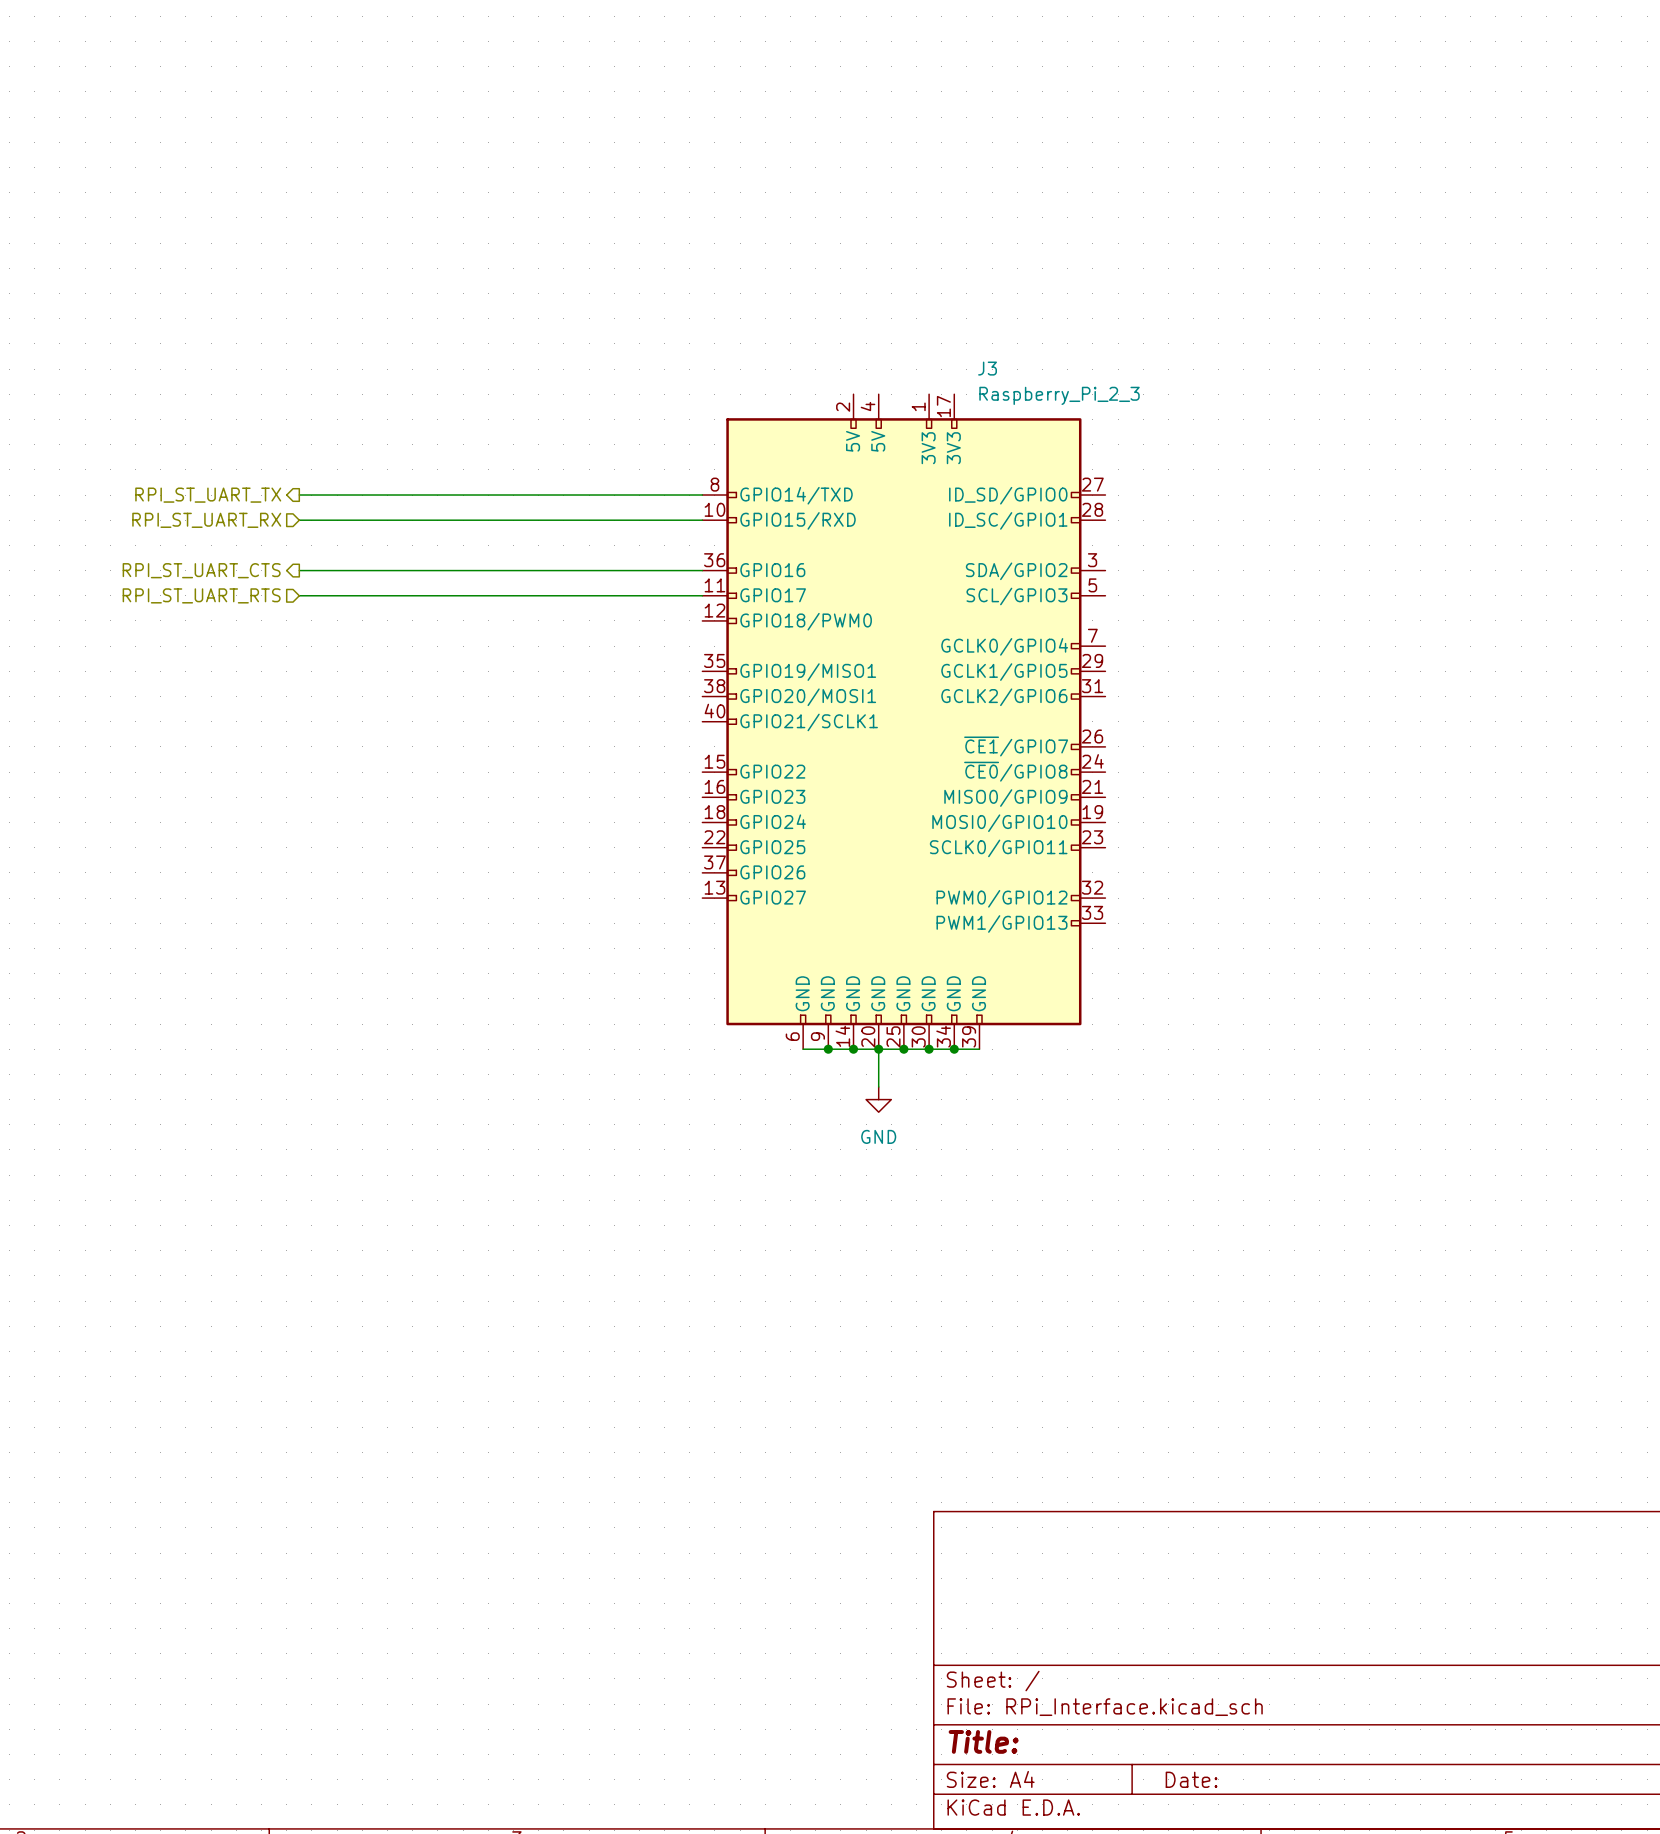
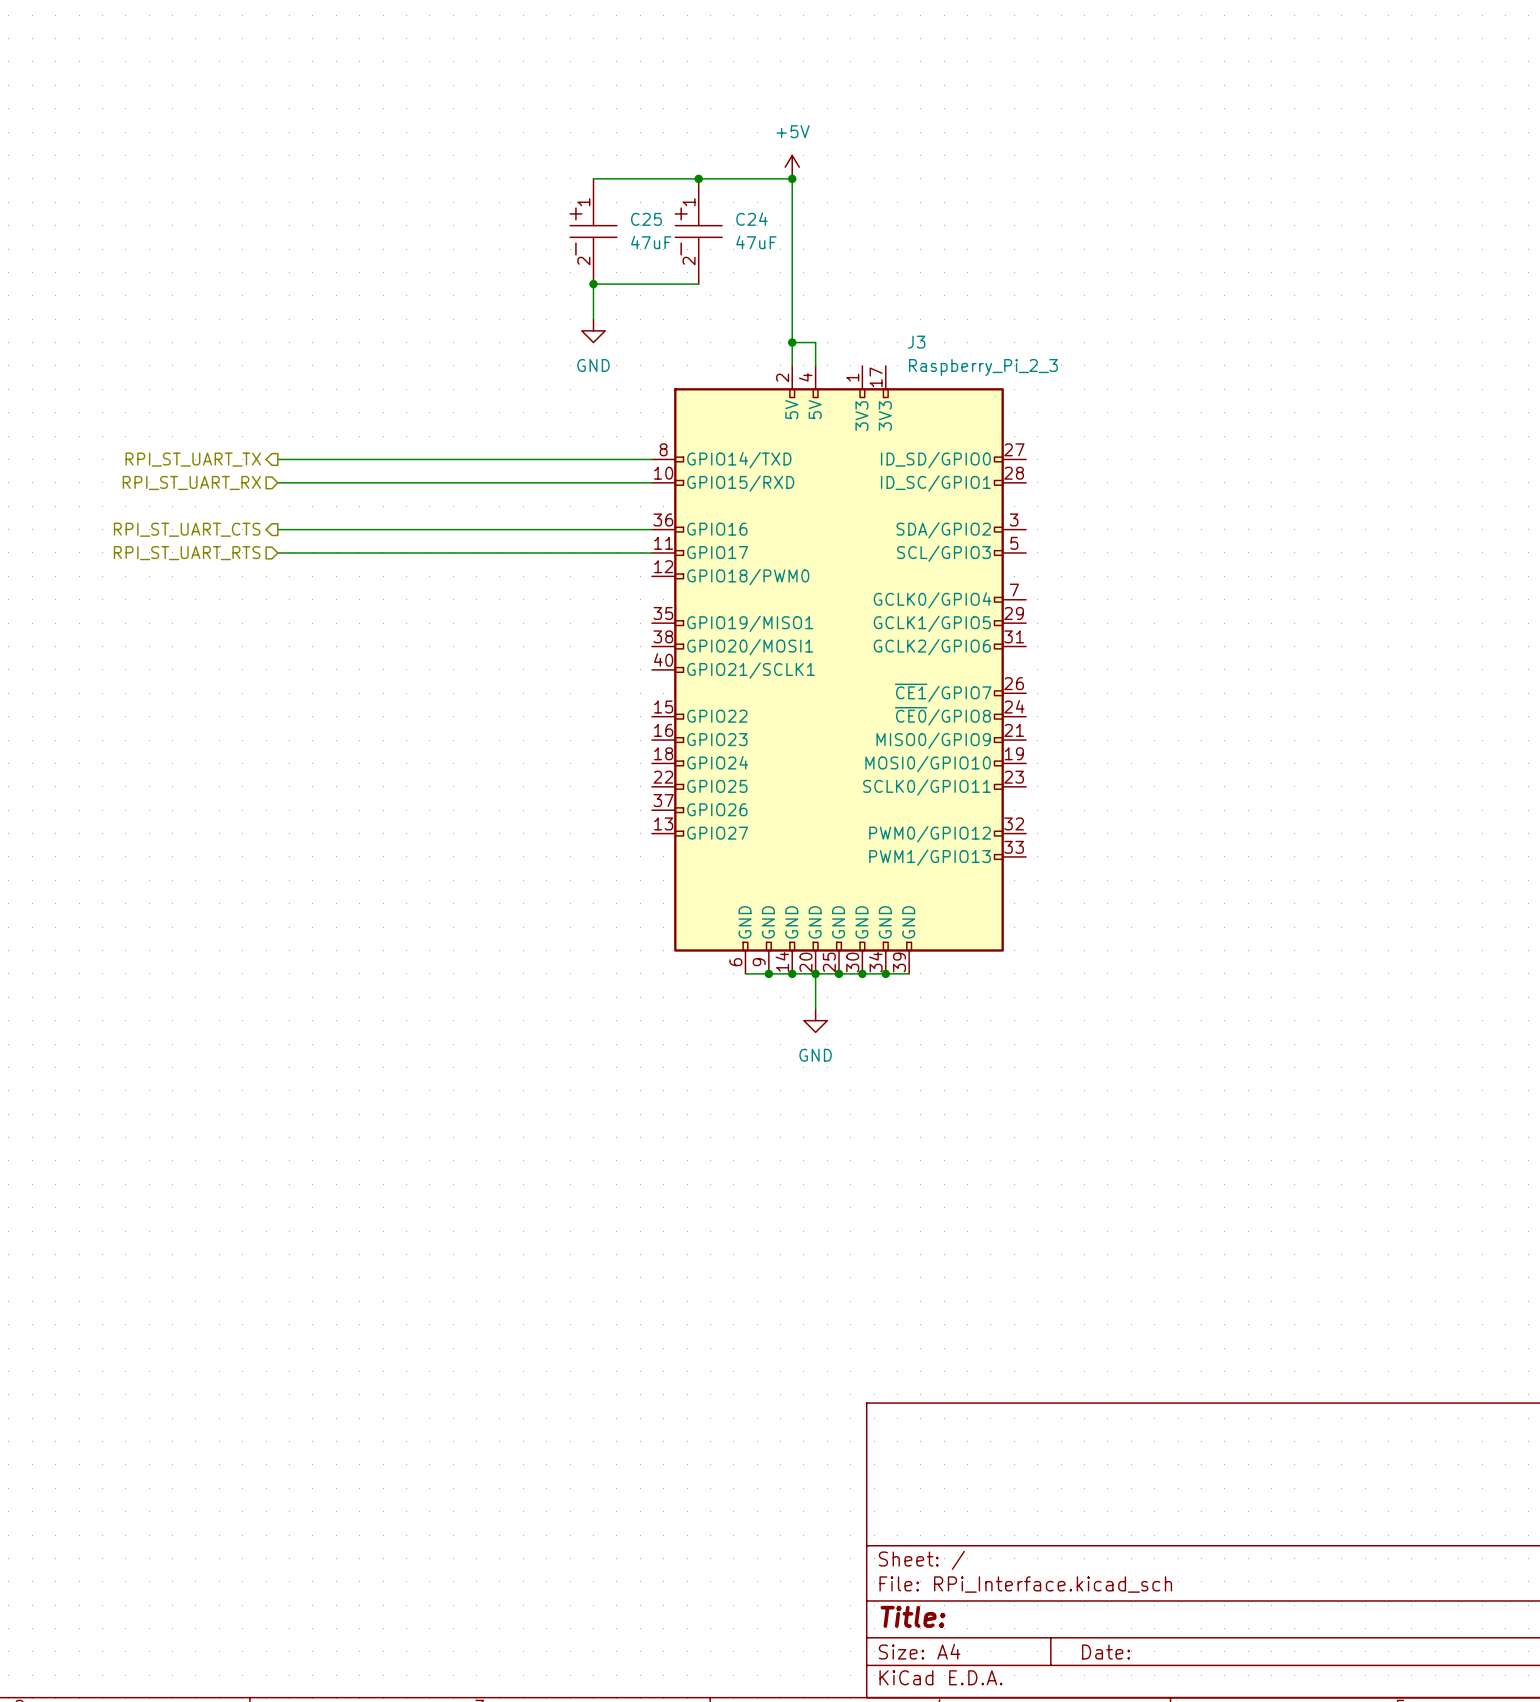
power symbol: none -> +5V (792, 167)
wire: none -> (593, 178) (792, 178) (792, 365)
junction: none -> (698, 178)
junction: none -> (792, 178)
C25: none -> (593, 231)
C24: none -> (698, 231)
junction: none -> (593, 284)
wire: none -> (698, 284) (593, 284) (593, 319)
power symbol: none -> GND (593, 330)
wire: none -> (792, 342) (815, 342) (815, 365)
junction: none -> (792, 342)

